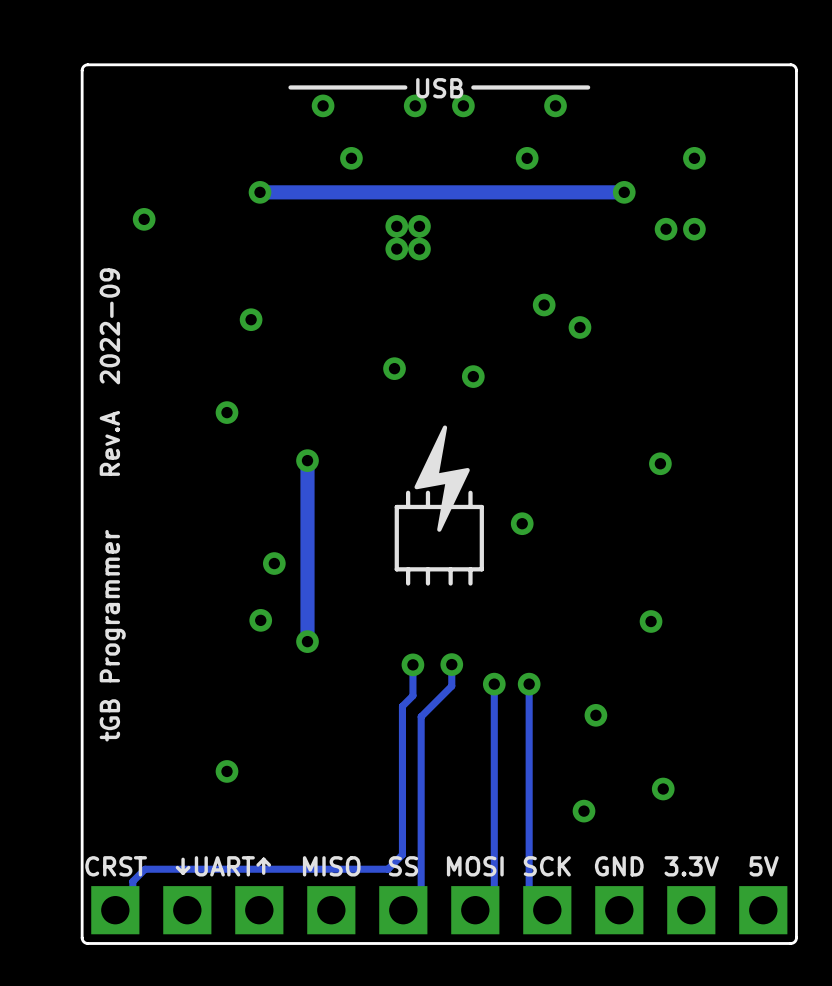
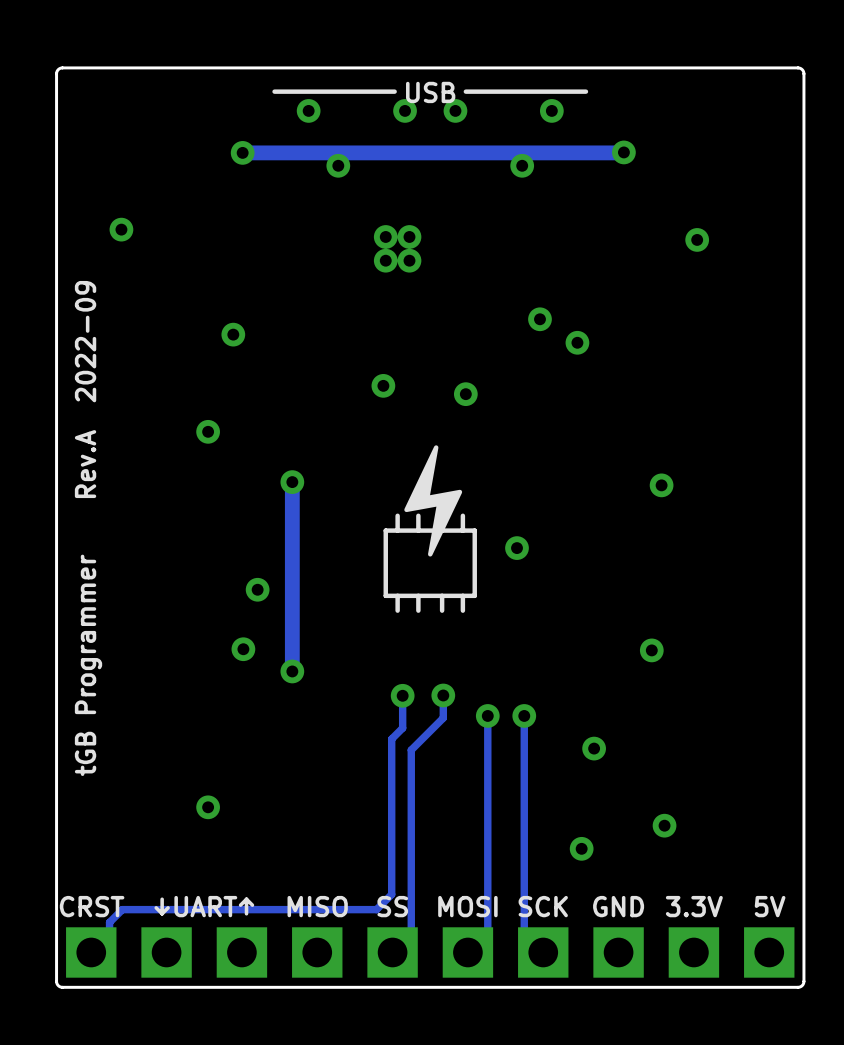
track: none -> (623, 152) (242, 152)
via: none -> (623, 152)
via: (694, 158) -> none
via position: (260, 192) -> (242, 152)
track: (624, 192) (260, 192) -> none
via: (624, 192) -> none
via: (666, 229) -> none

